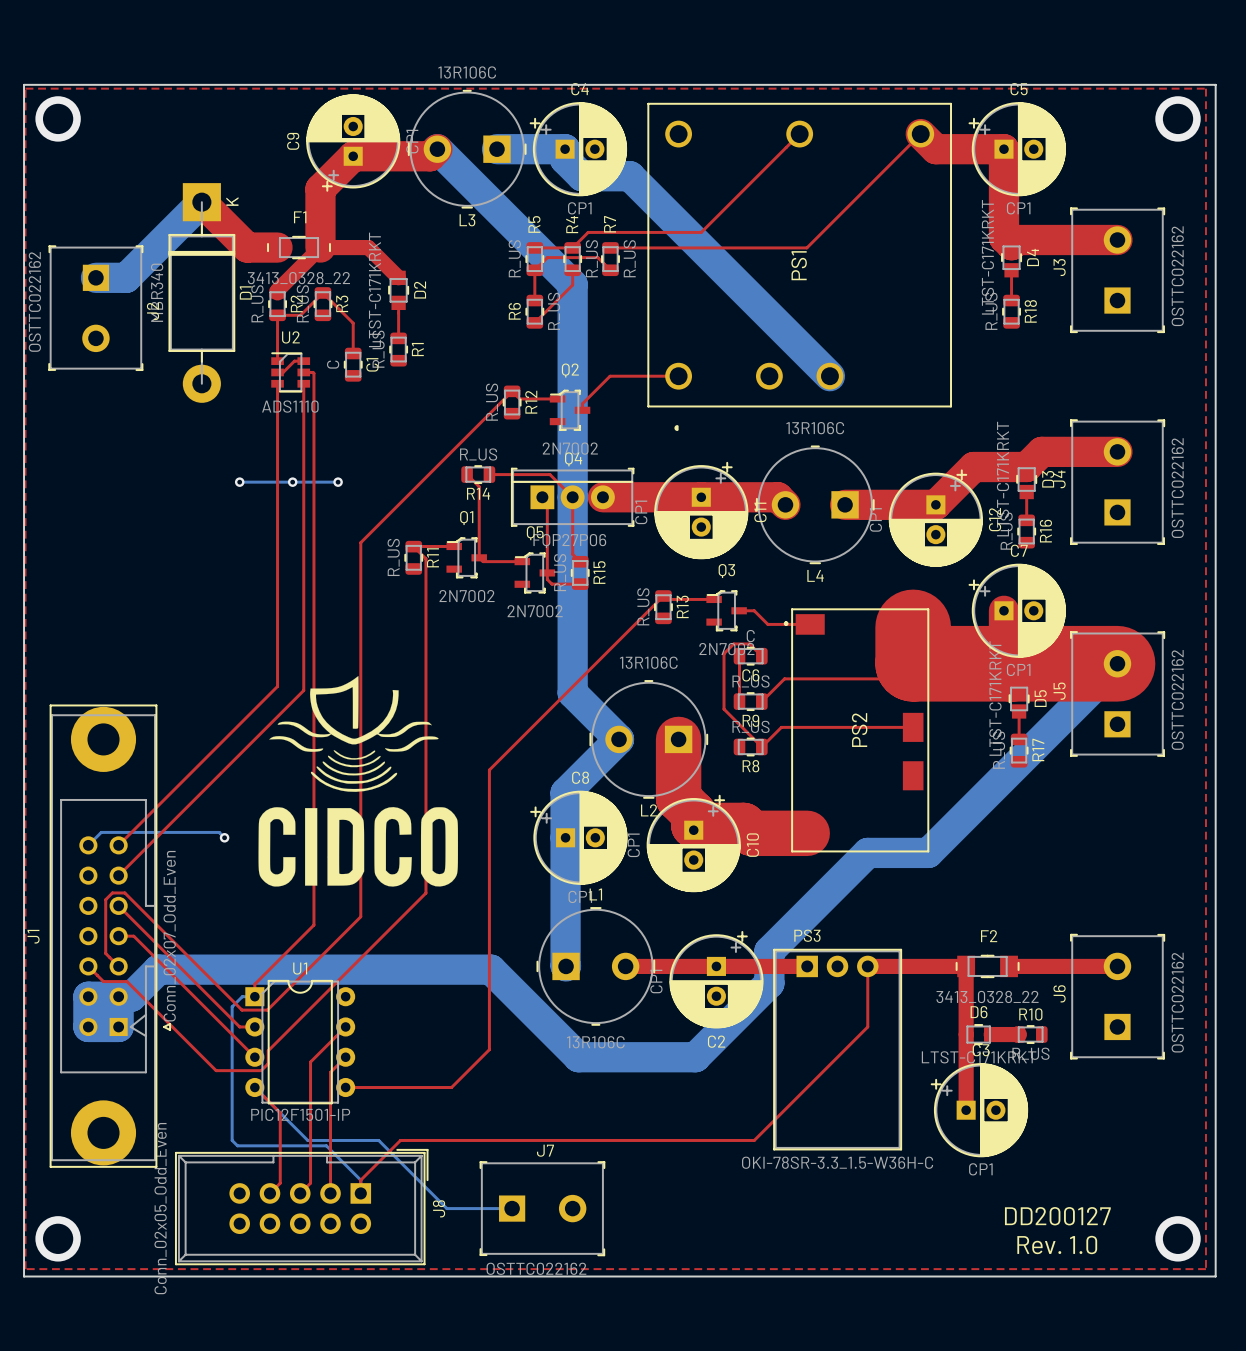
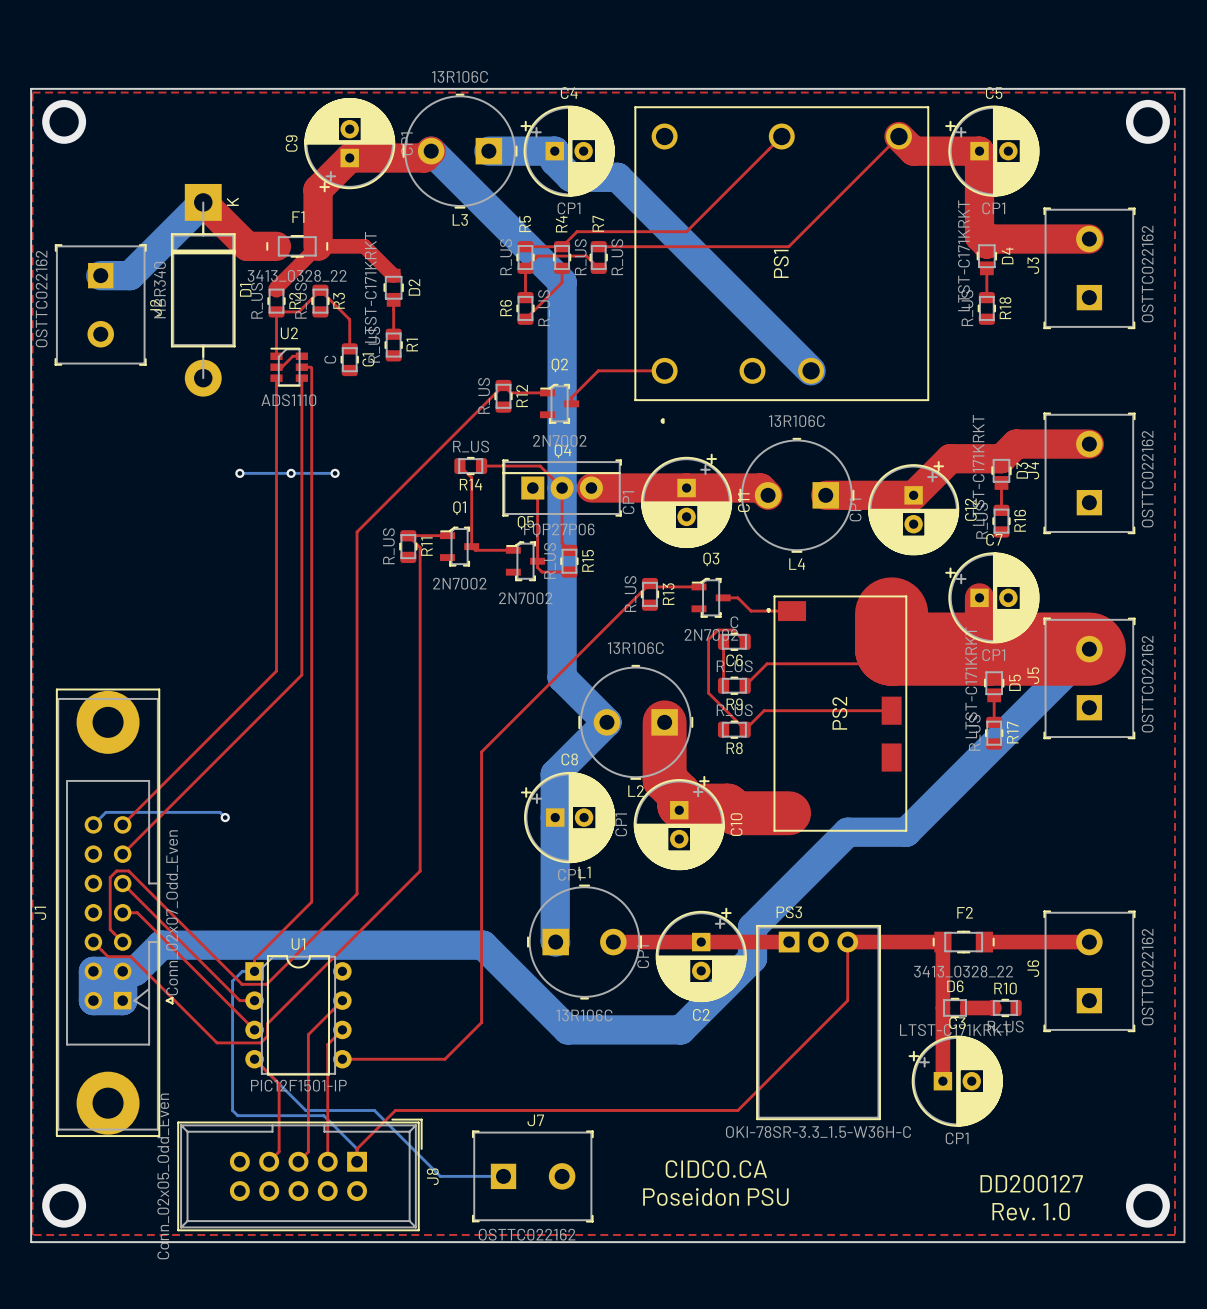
drawing: [258, 676, 459, 887] -> none
text: none -> CIDCO.CA (716, 1169)
text: none -> Poseidon PSU (715, 1196)

